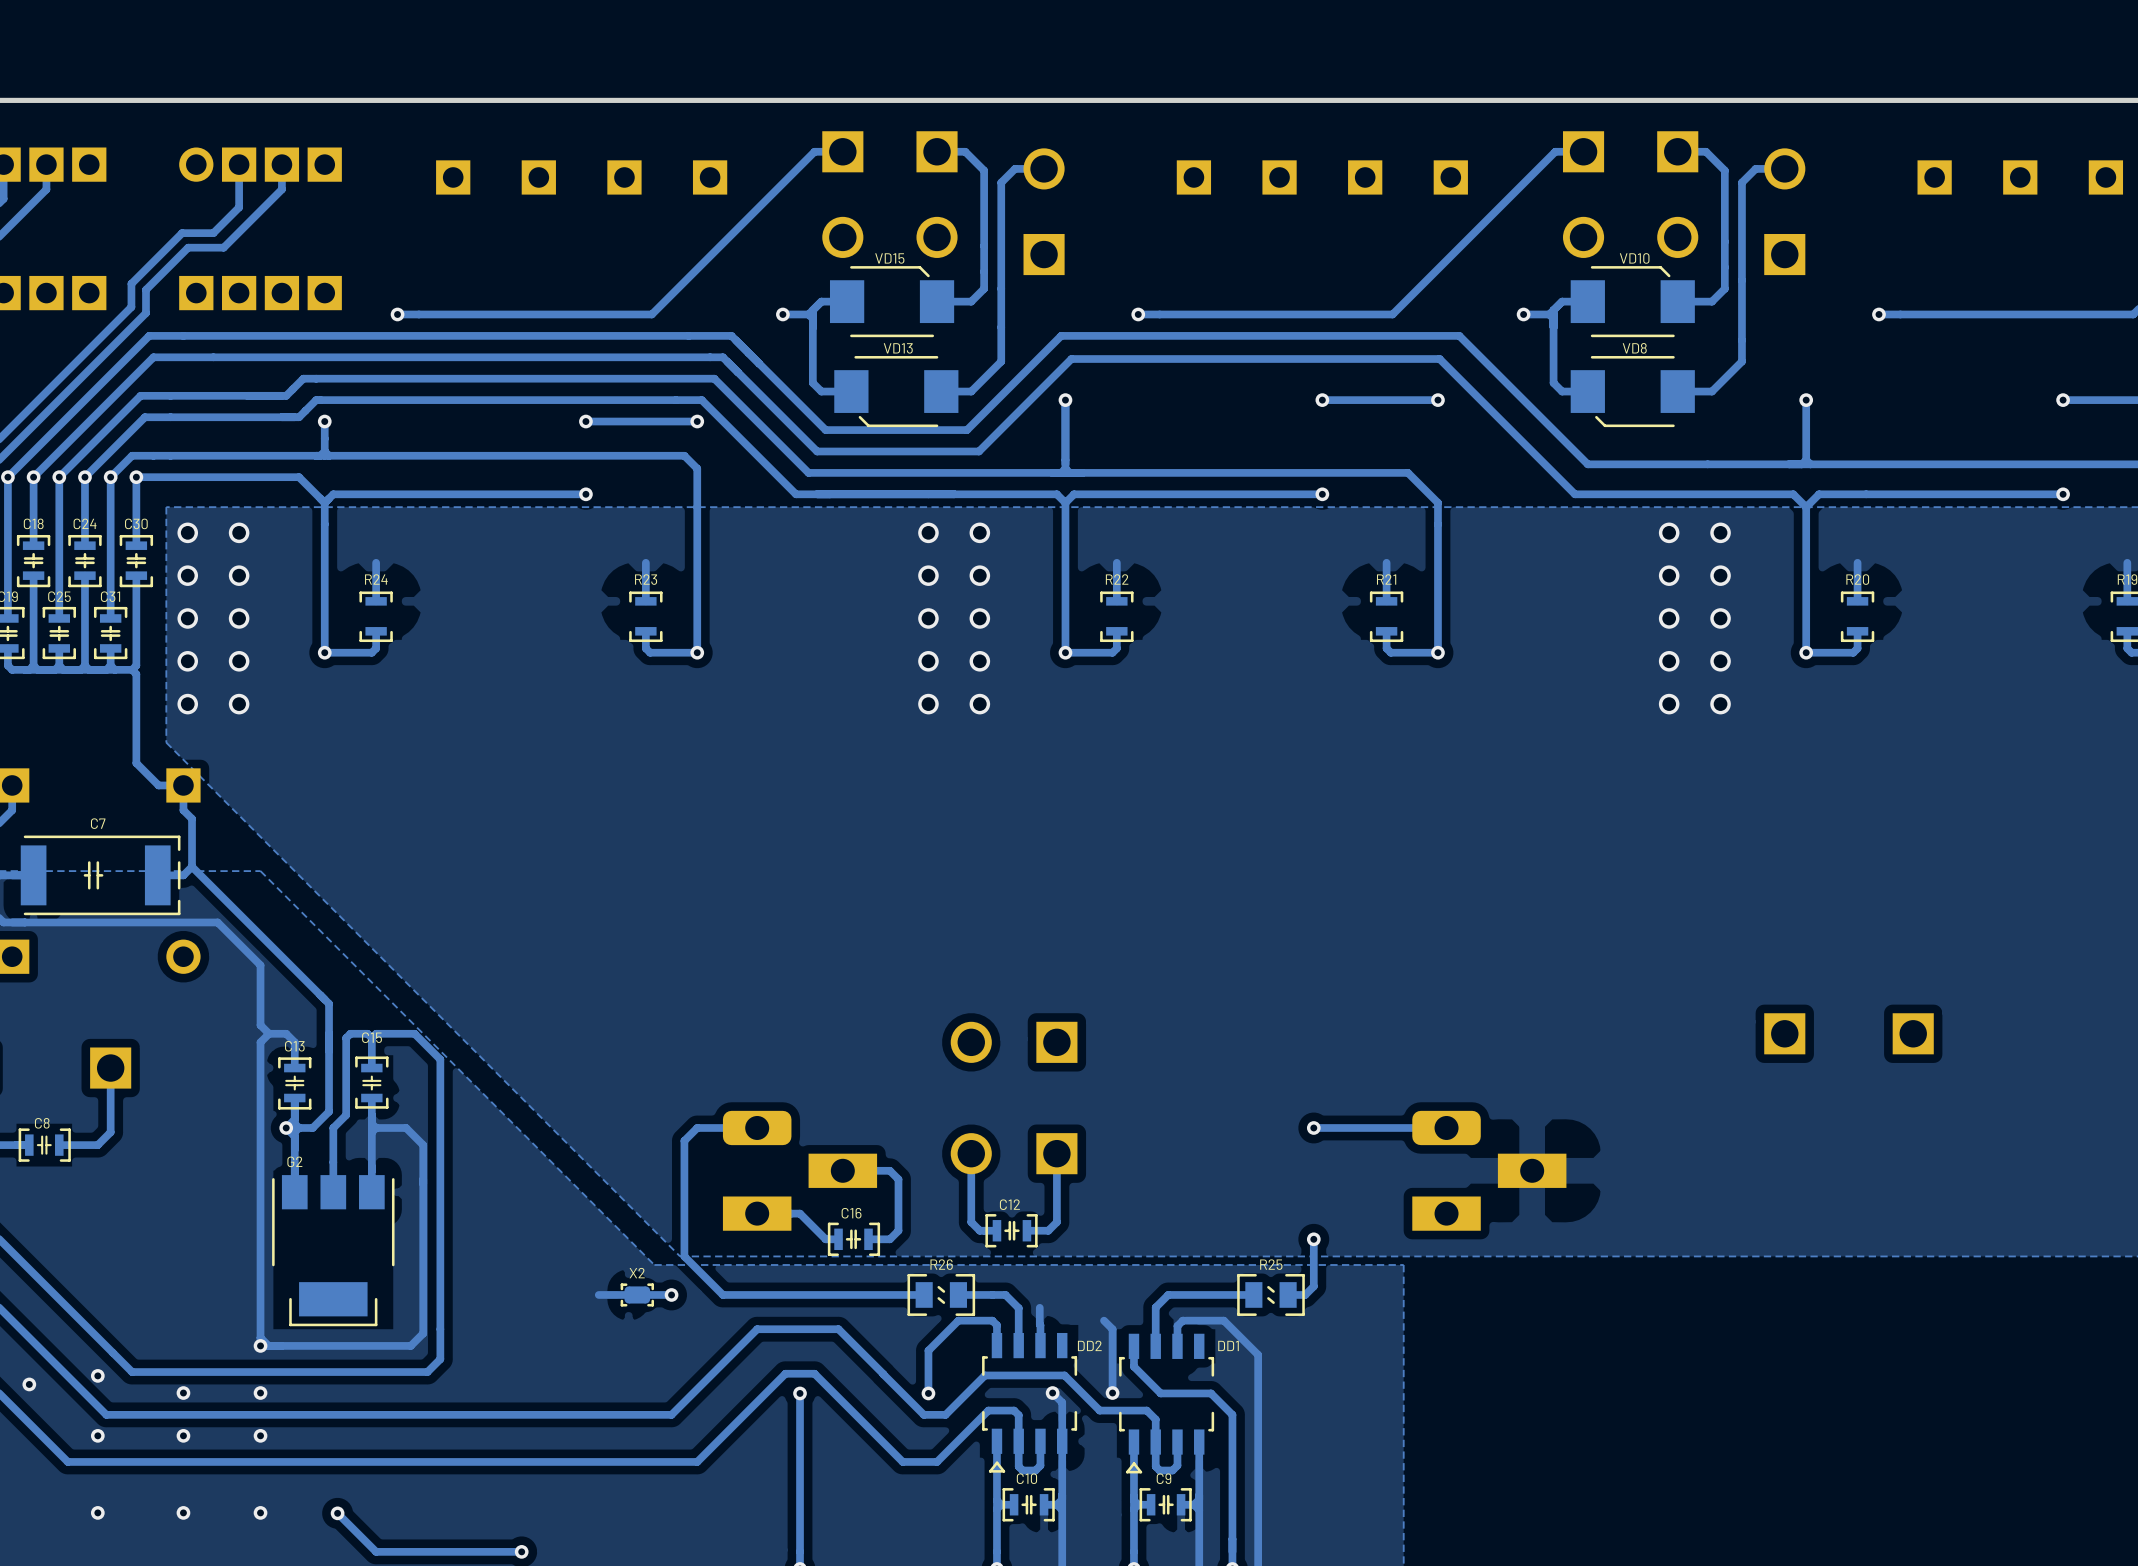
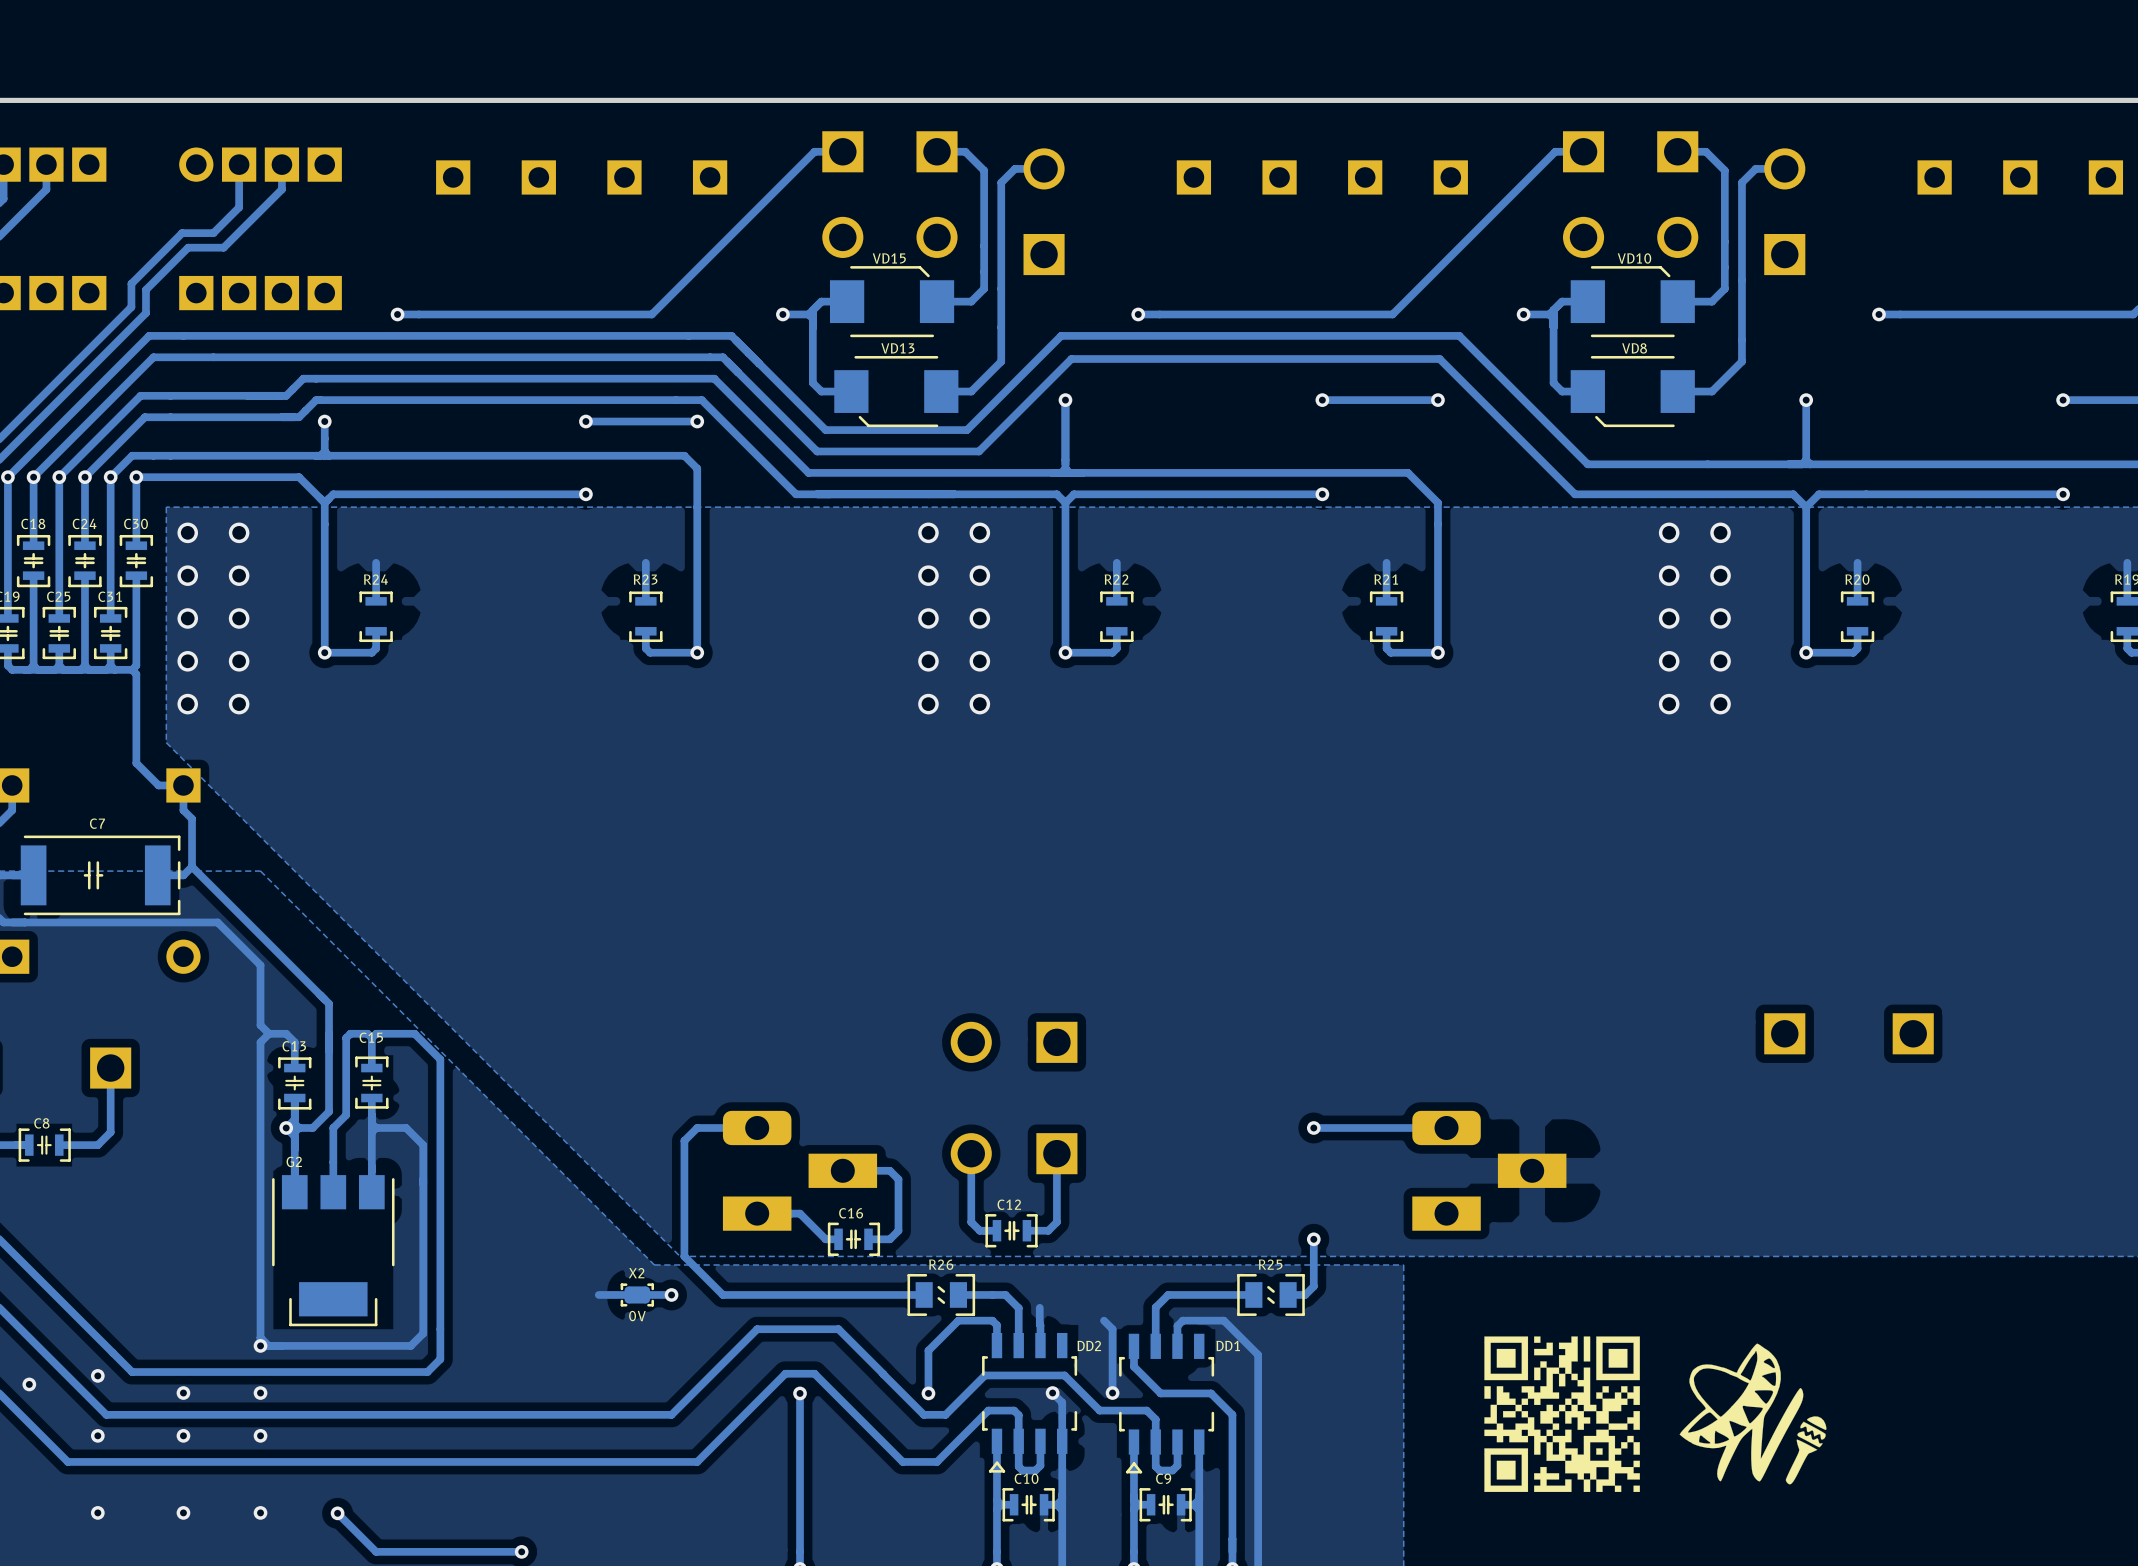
text: none -> 0V (637, 1316)
drawing: none -> [1484, 1336, 1640, 1493]
drawing: none -> [1679, 1343, 1827, 1485]

